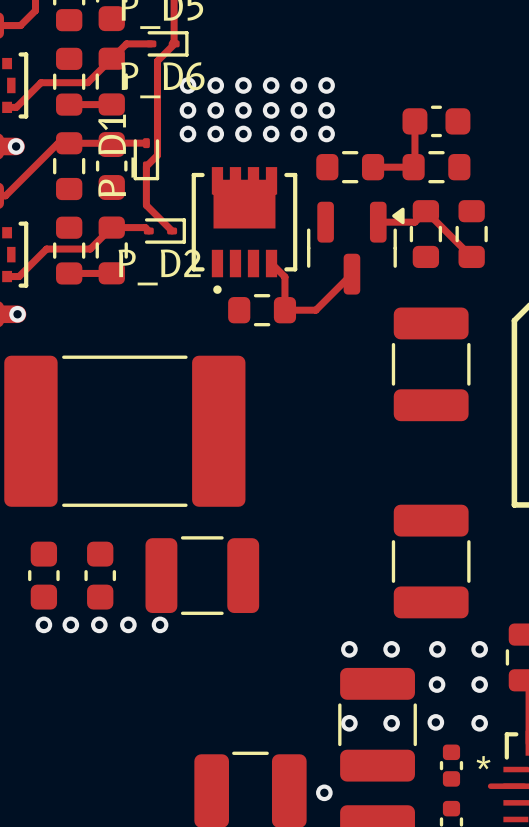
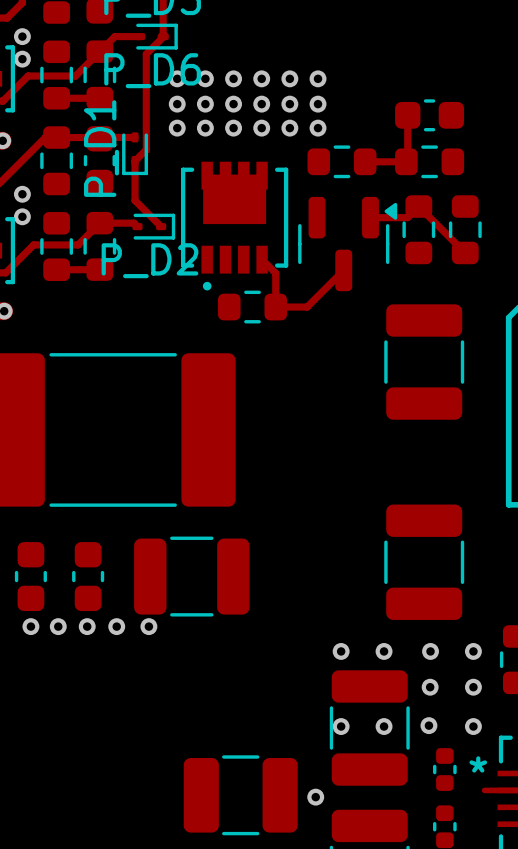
via: none -> (22, 36)
via: none -> (22, 59)
via: none -> (22, 194)
via: none -> (22, 216)

